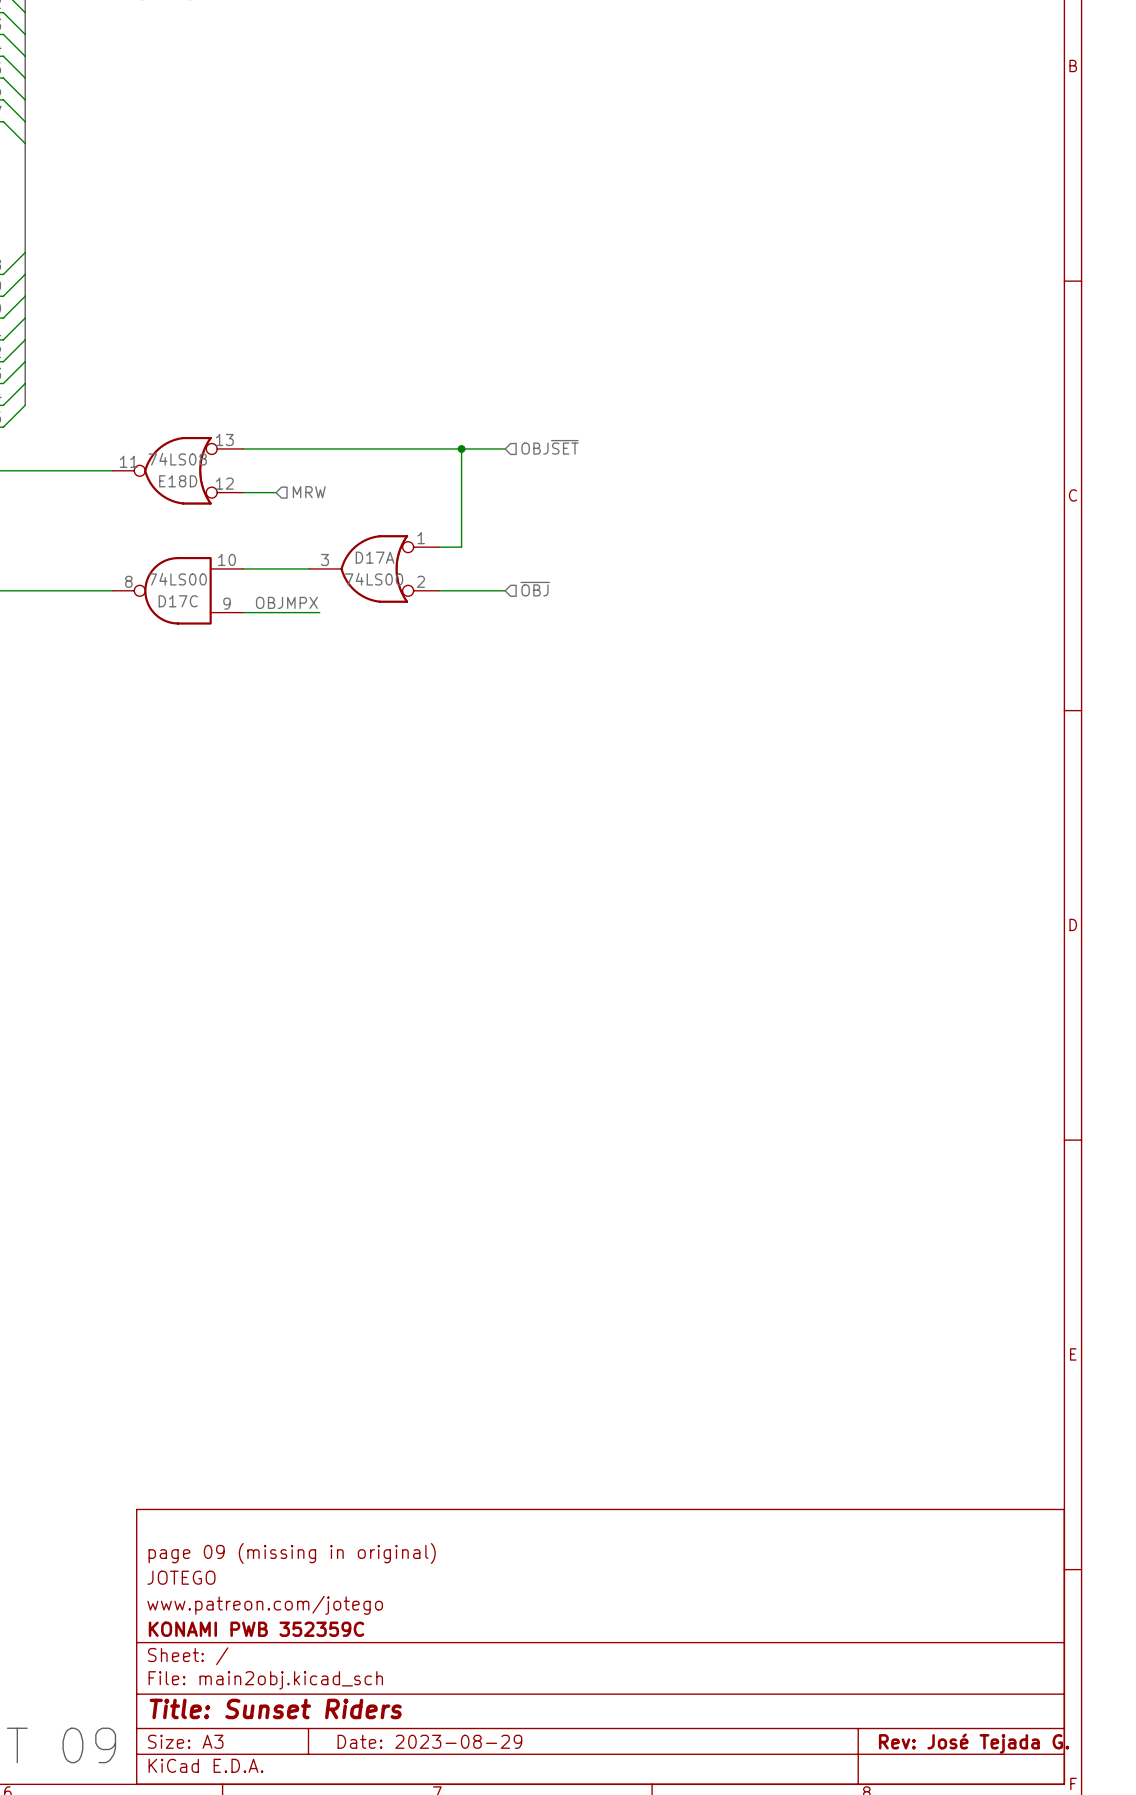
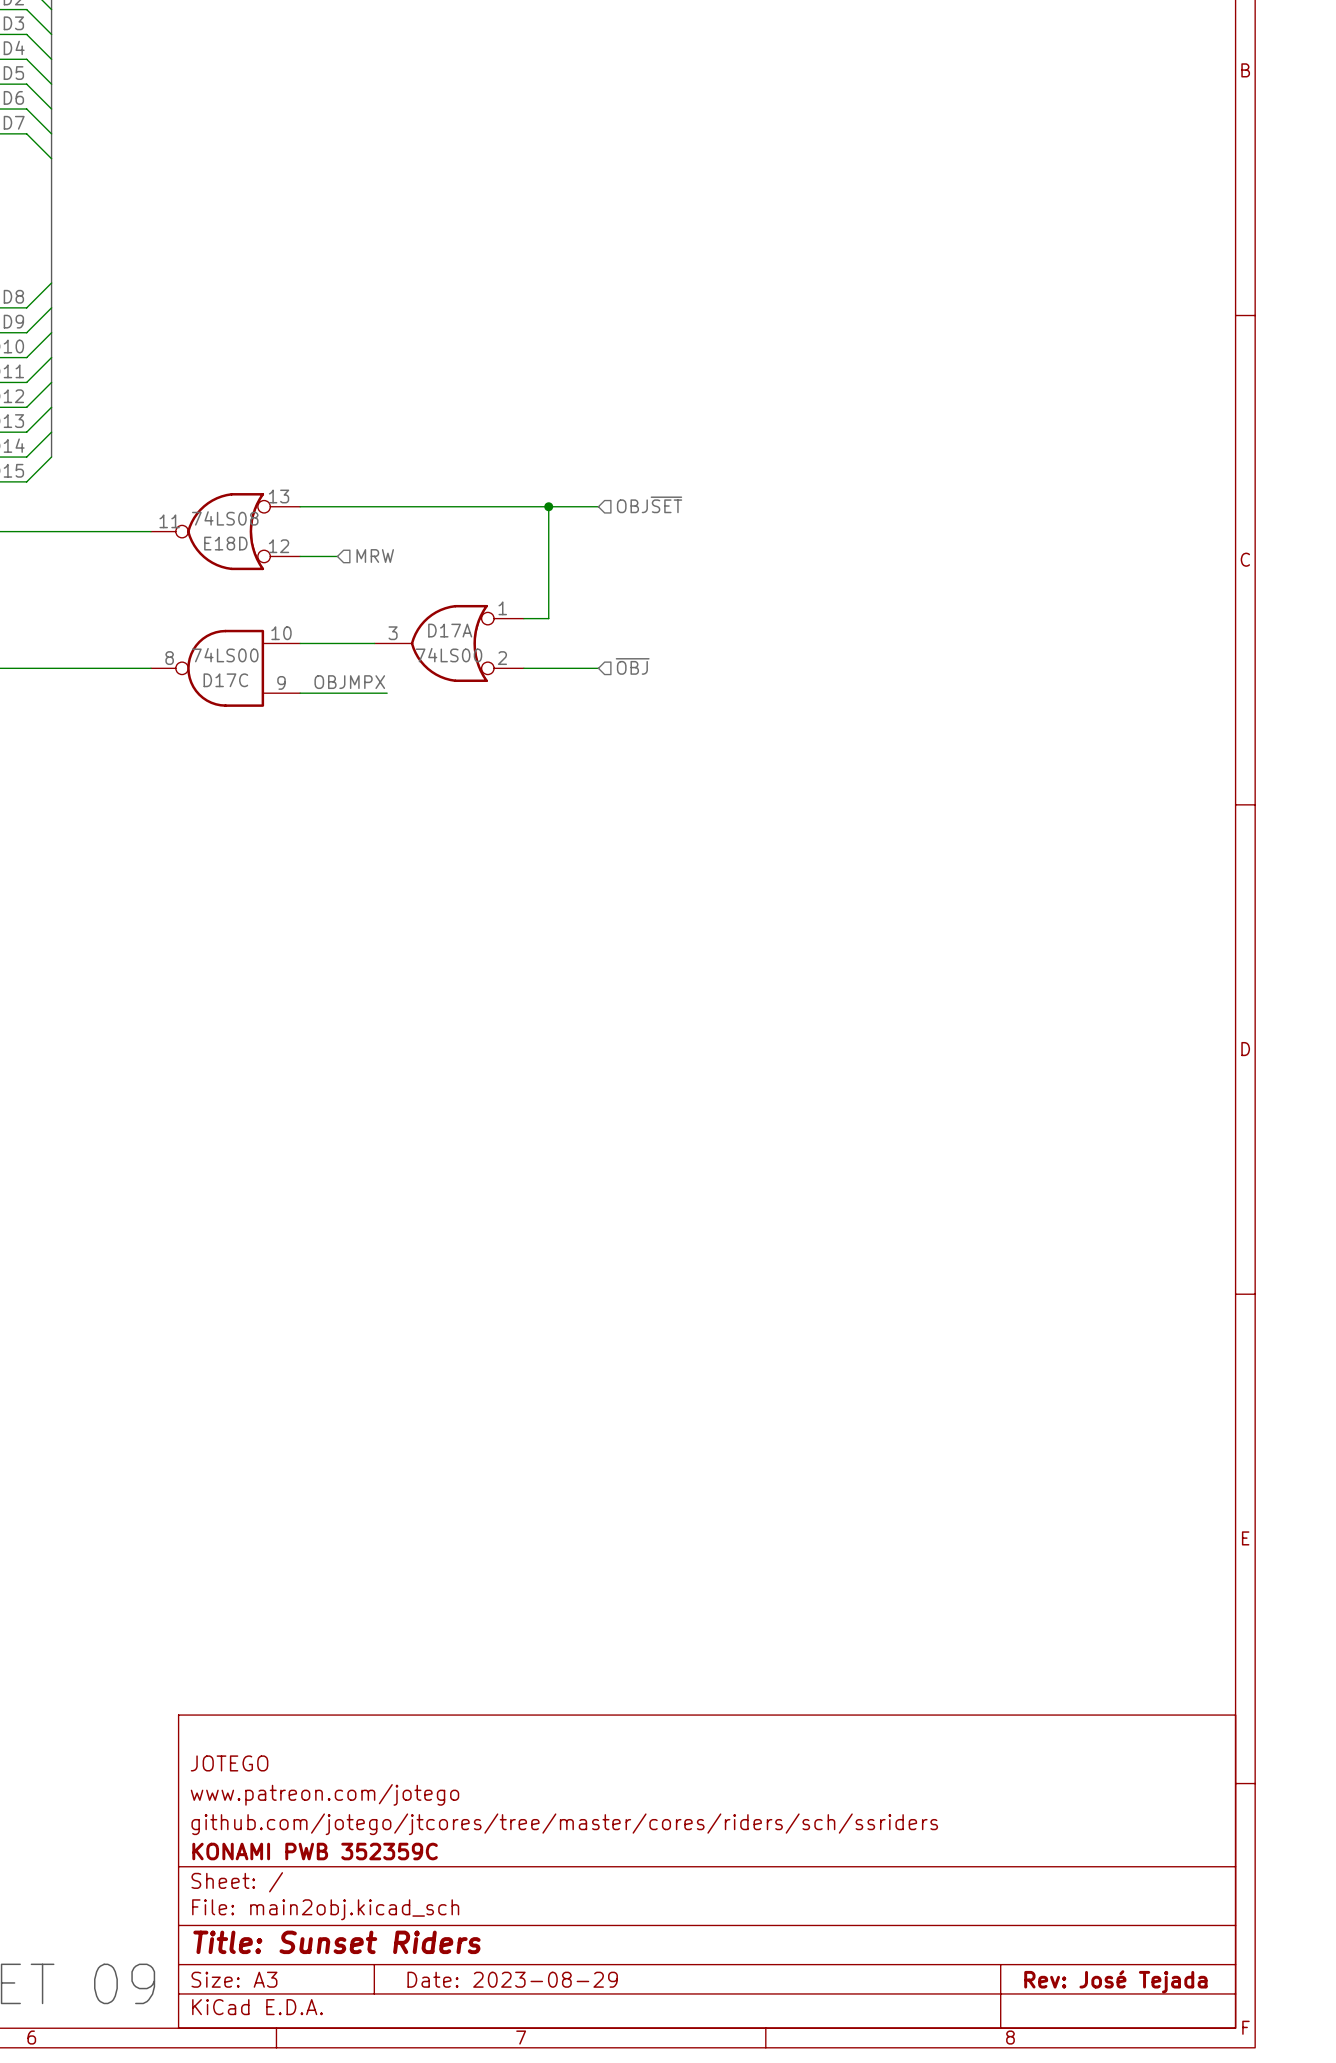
title block: page 09 (missing in original) (292, 1553) -> JOTEGO (229, 1763)
title block: JOTEGO (181, 1577) -> www.patreon.com/jotego (324, 1794)
title block: www.patreon.com/jotego (265, 1605) -> github.com/jotego/jtcores/tree/master/cores/riders/sch/ssriders (564, 1824)
title block: Rev: José Tejada G. (974, 1743) -> Rev: José Tejada (1115, 1981)

